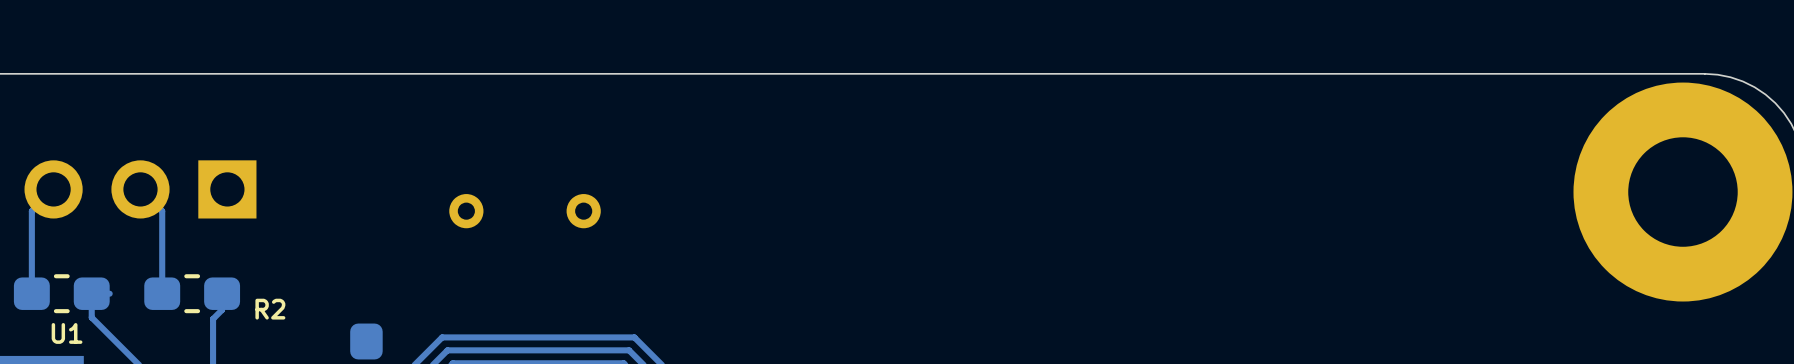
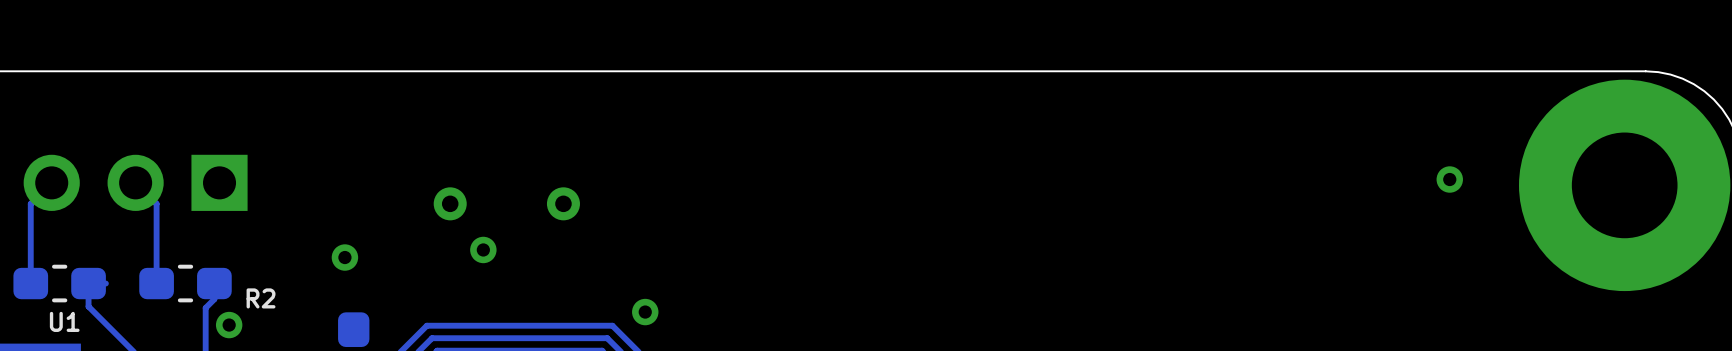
via: none -> (1449, 179)
via: none -> (483, 249)
via: none -> (344, 257)
via: none -> (645, 312)
via: none -> (229, 325)

